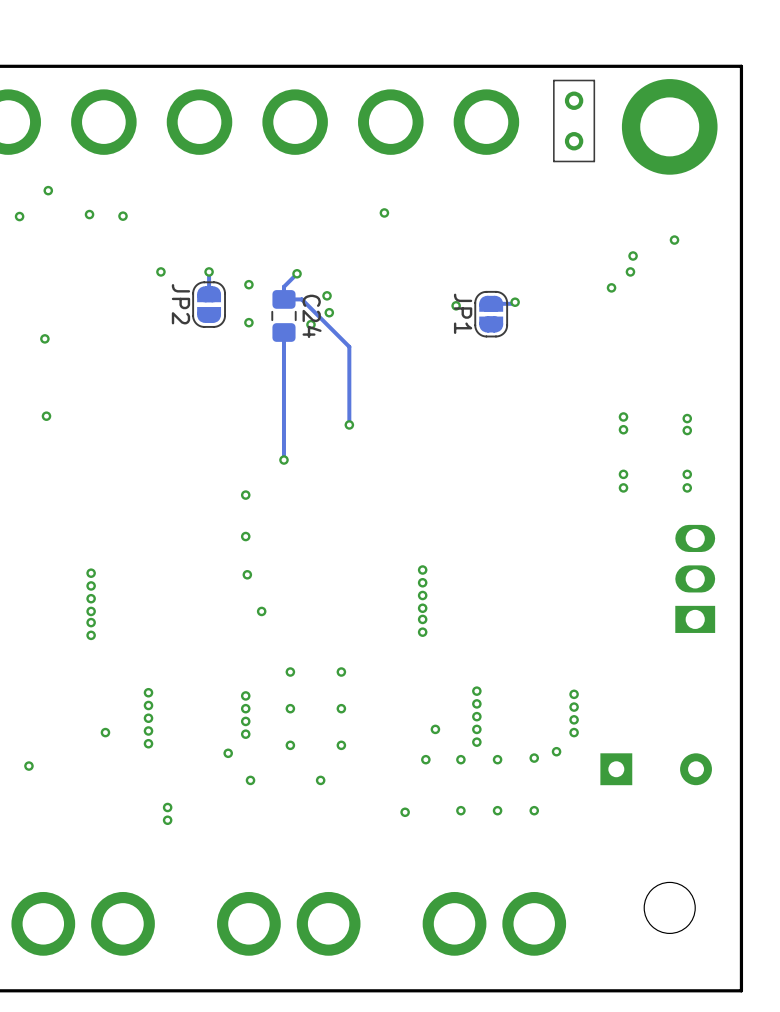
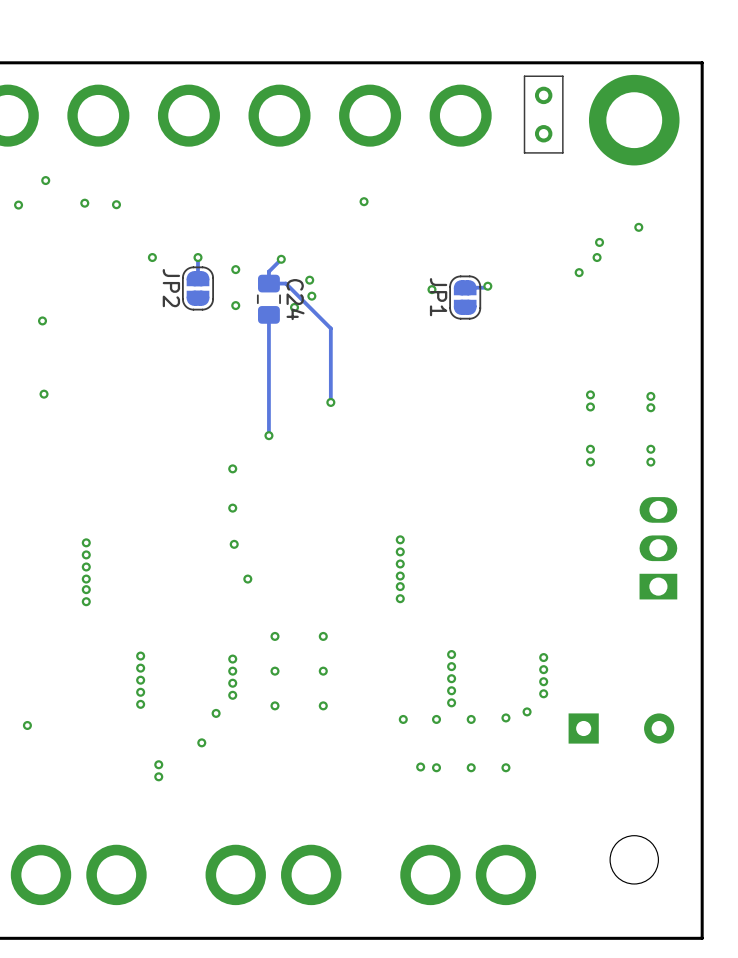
via: (435, 729) -> none
via: (105, 732) -> none
via position: (250, 780) -> (201, 742)
via: (320, 780) -> none
via position: (405, 812) -> (420, 767)

